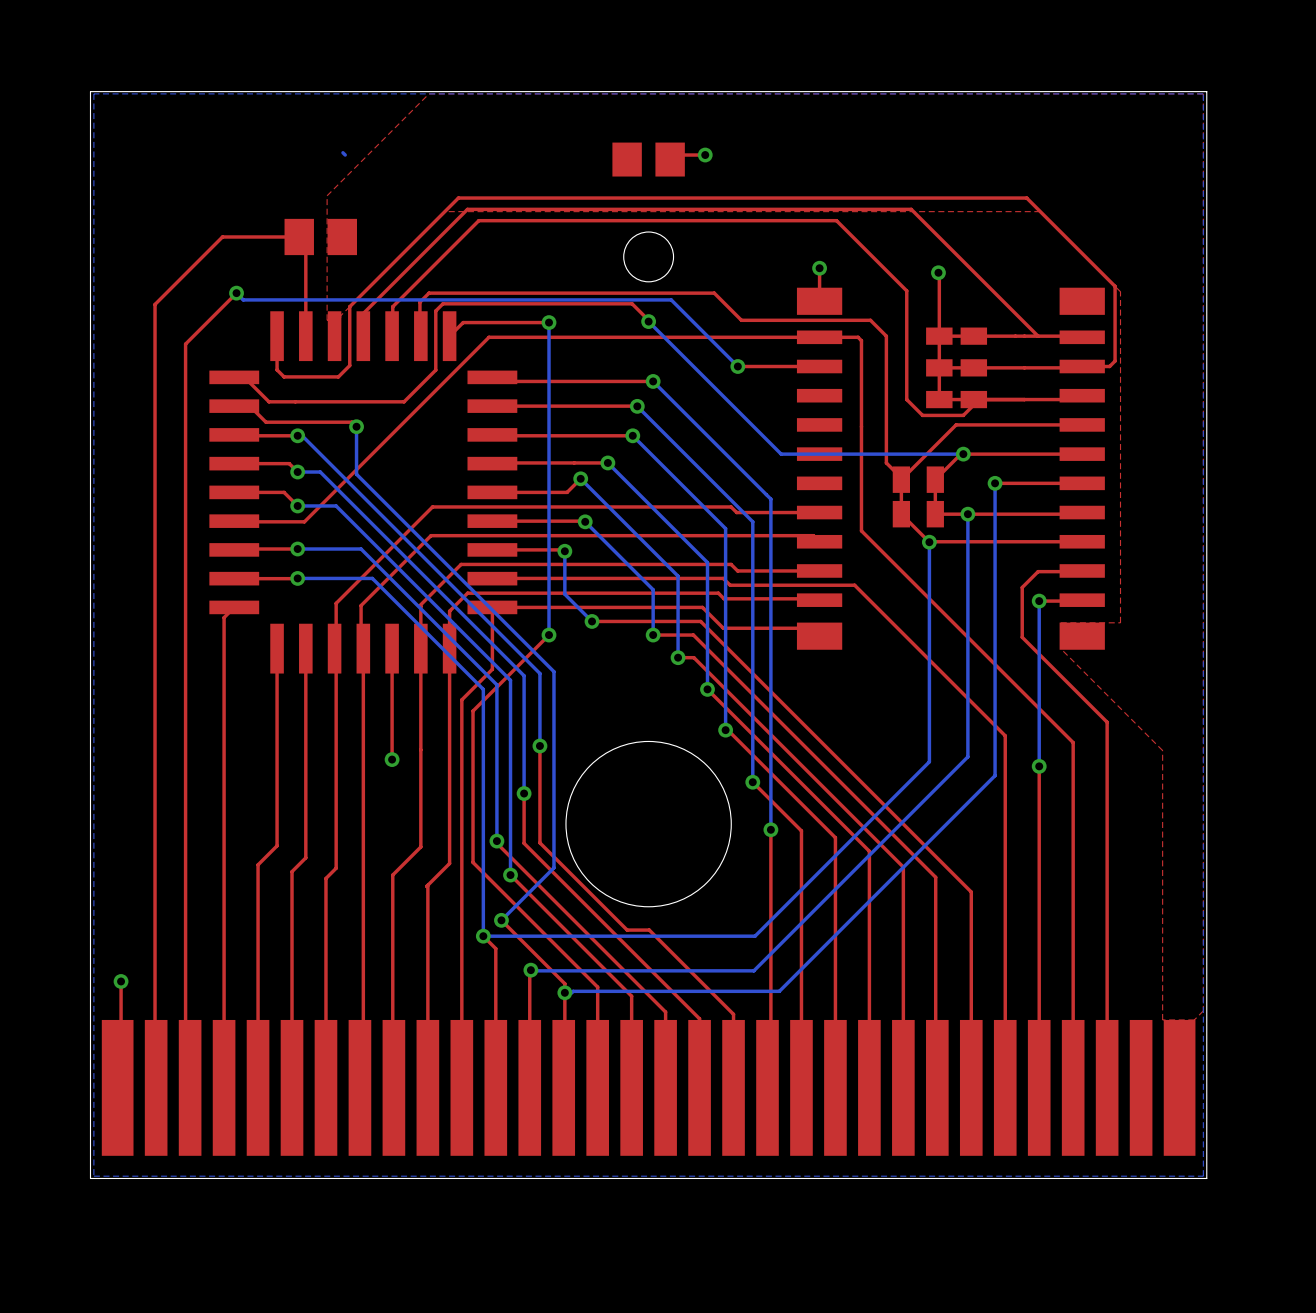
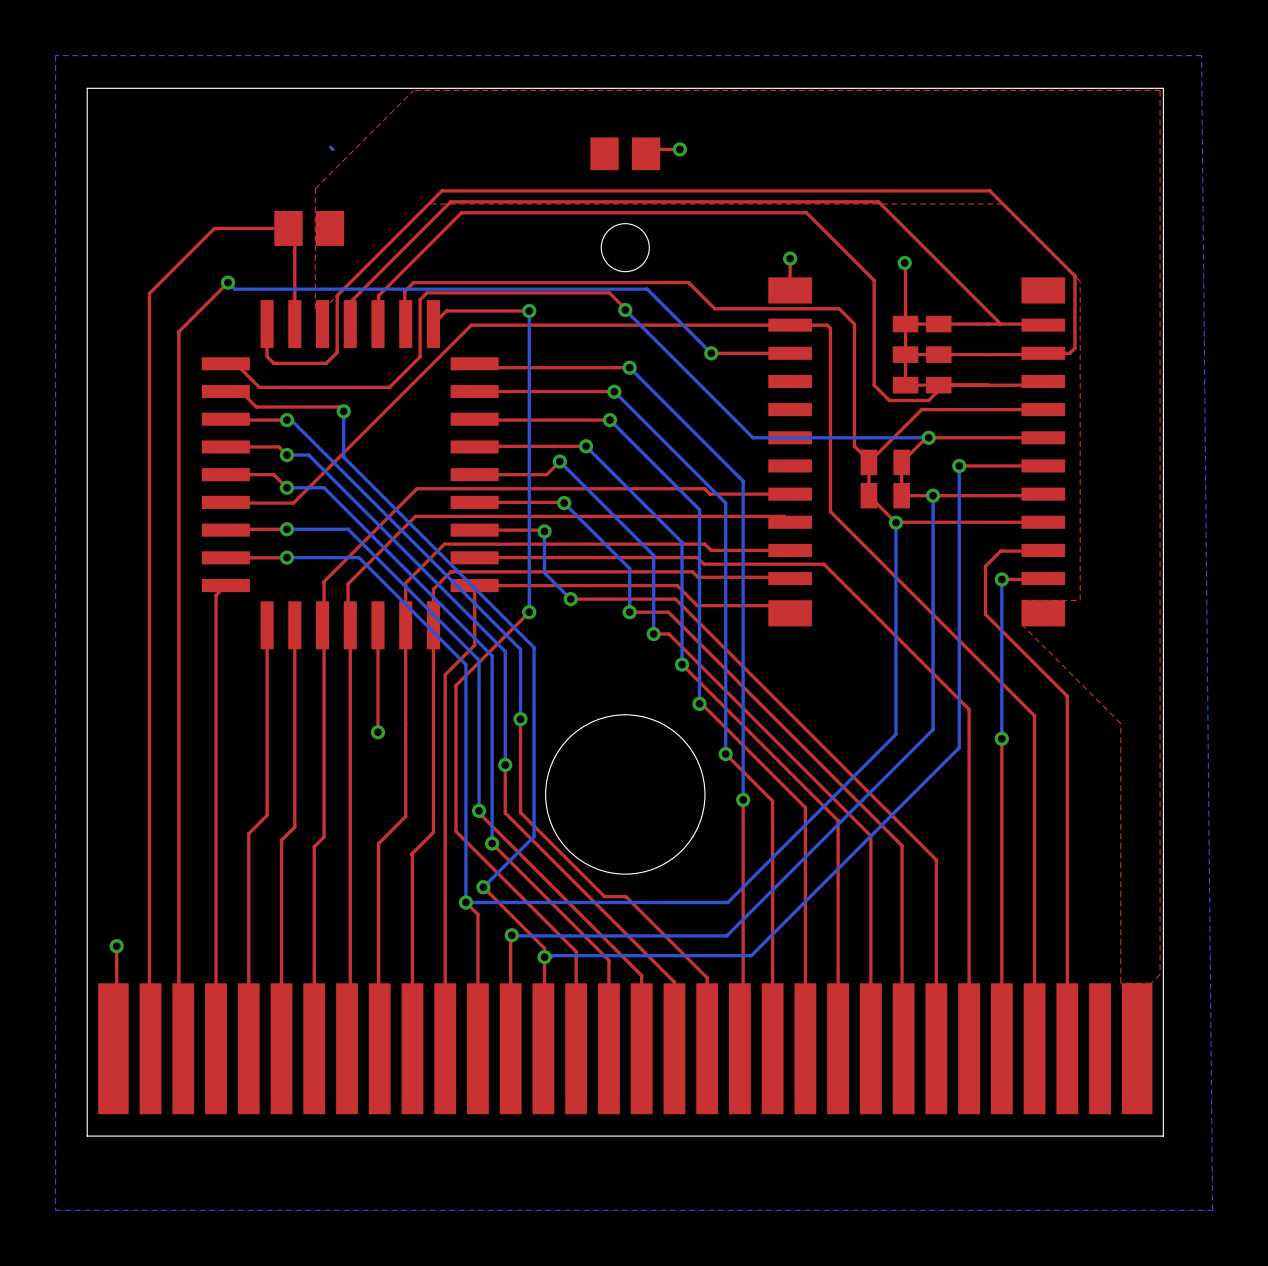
bottom zone outline: (1203, 93) (93, 93) (93, 1176) (1203, 1176) (1203, 93) -> (1201, 55) (1212, 1210) (55, 1210) (55, 55) (1201, 55)

